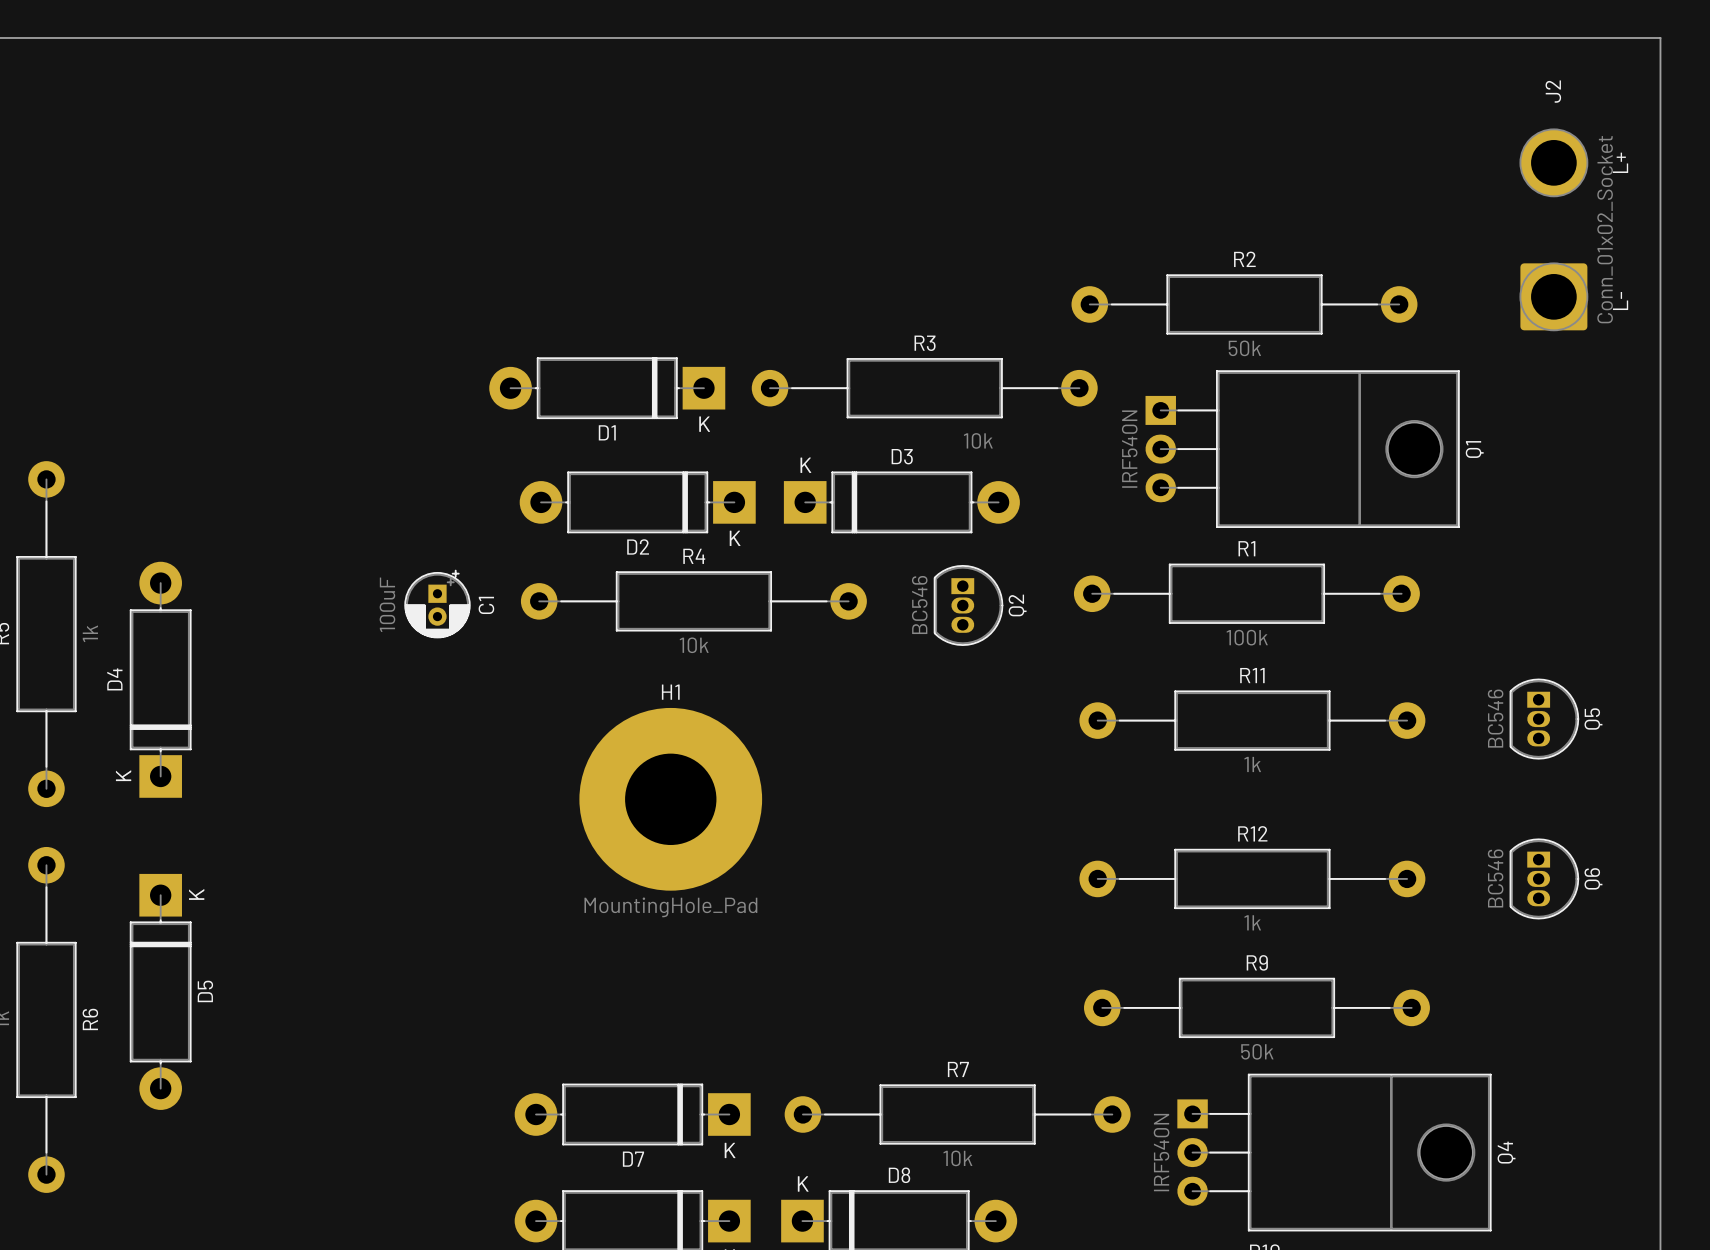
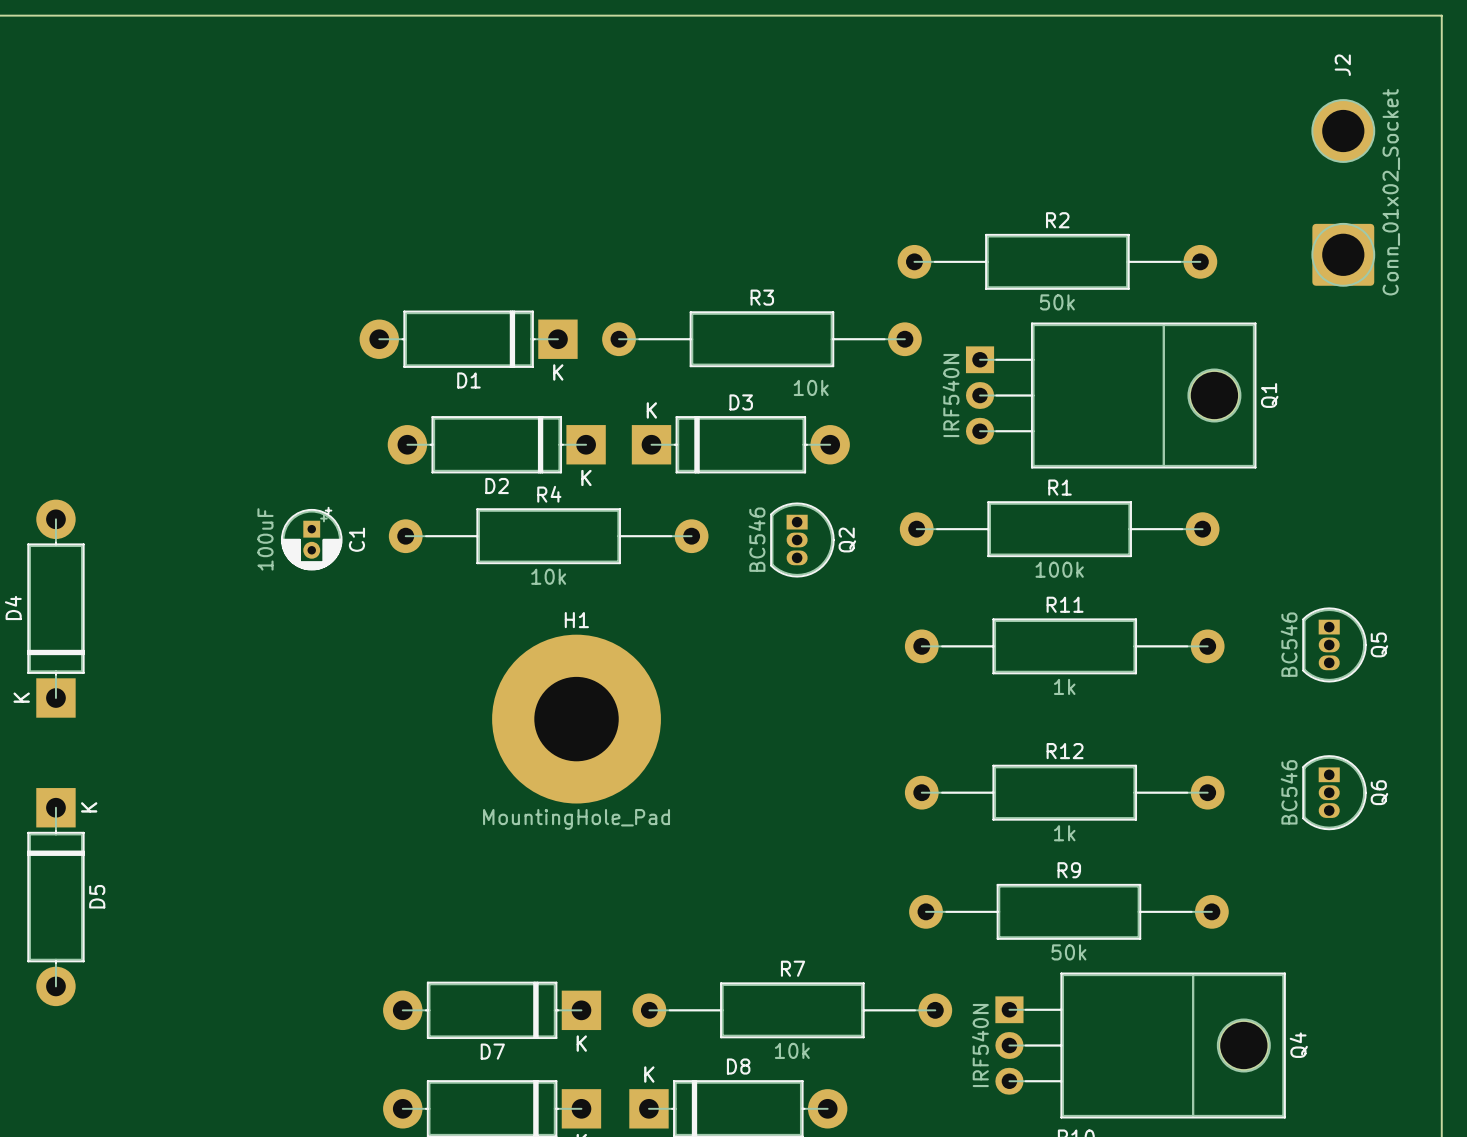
text: L+ (1620, 162) -> none
text: L- (1620, 301) -> none
H1 position: (670, 799) -> (576, 719)

